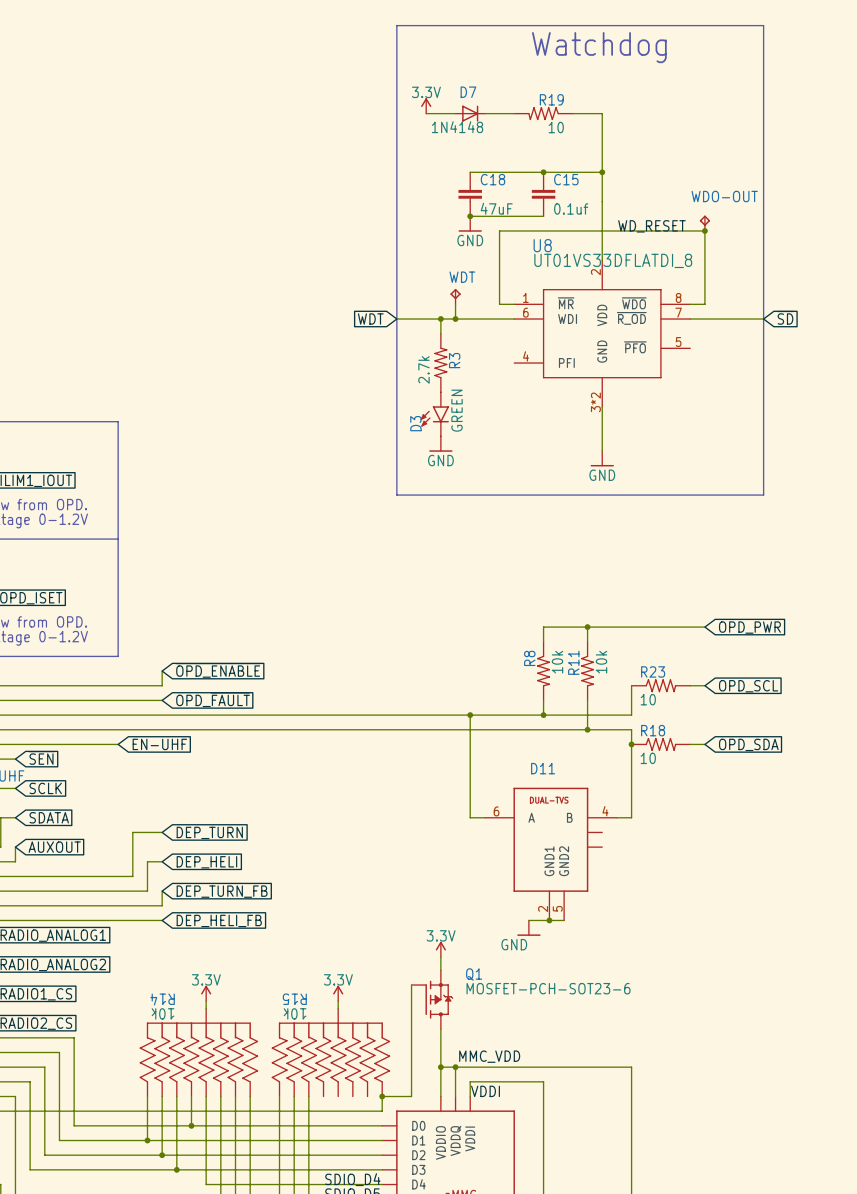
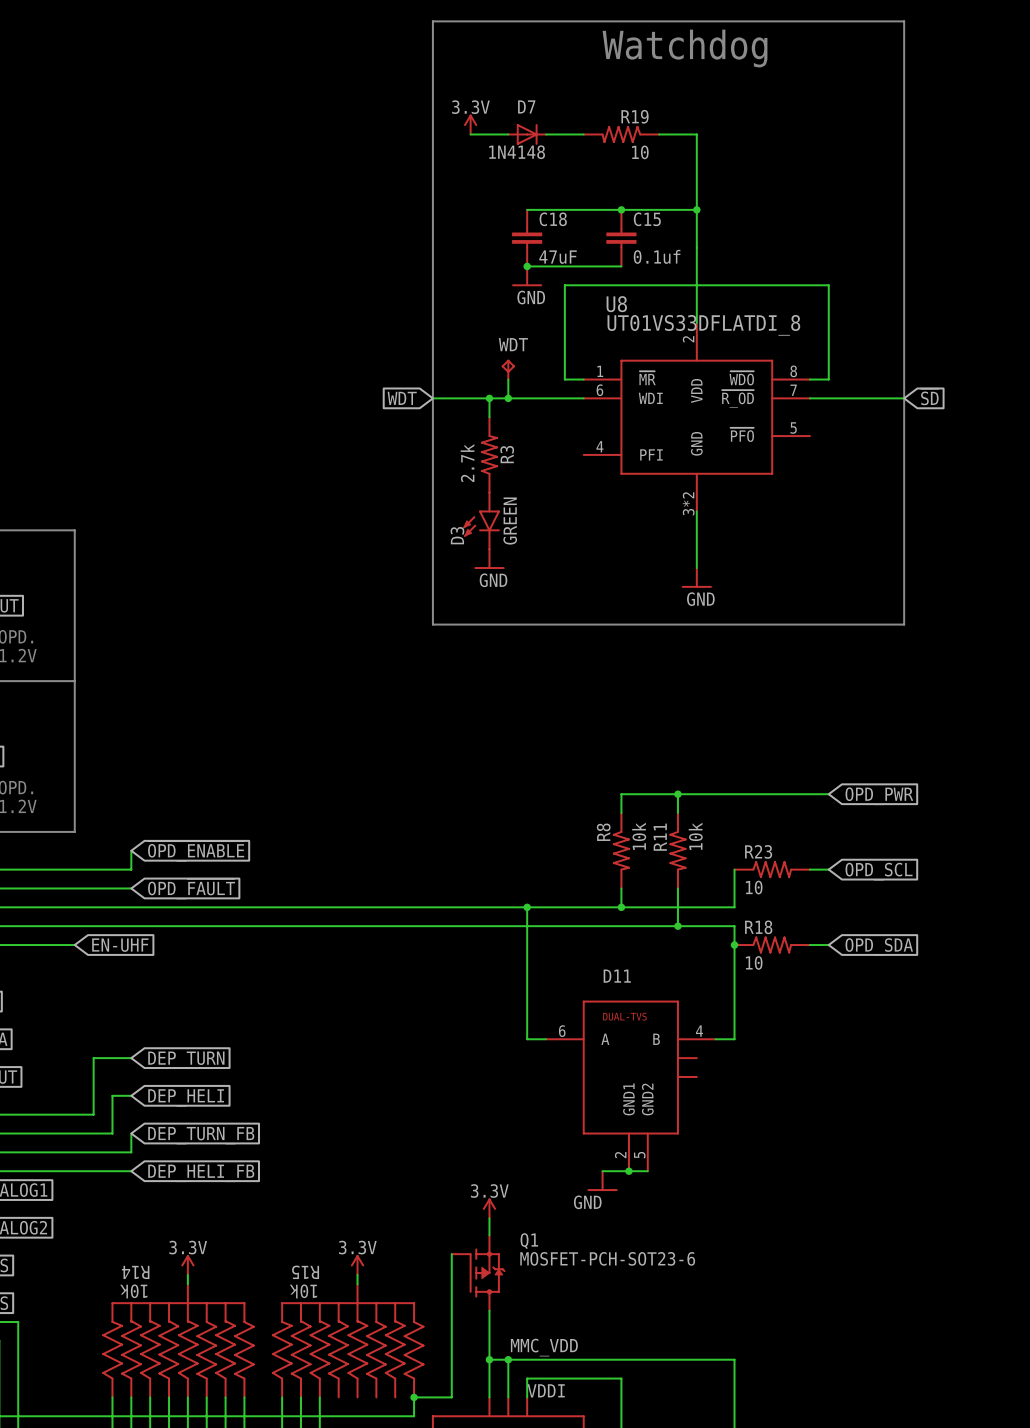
WDO-OUT: (704, 223) -> none
label: WD_RESET (652, 226) -> none
junction: (704, 230) -> none

